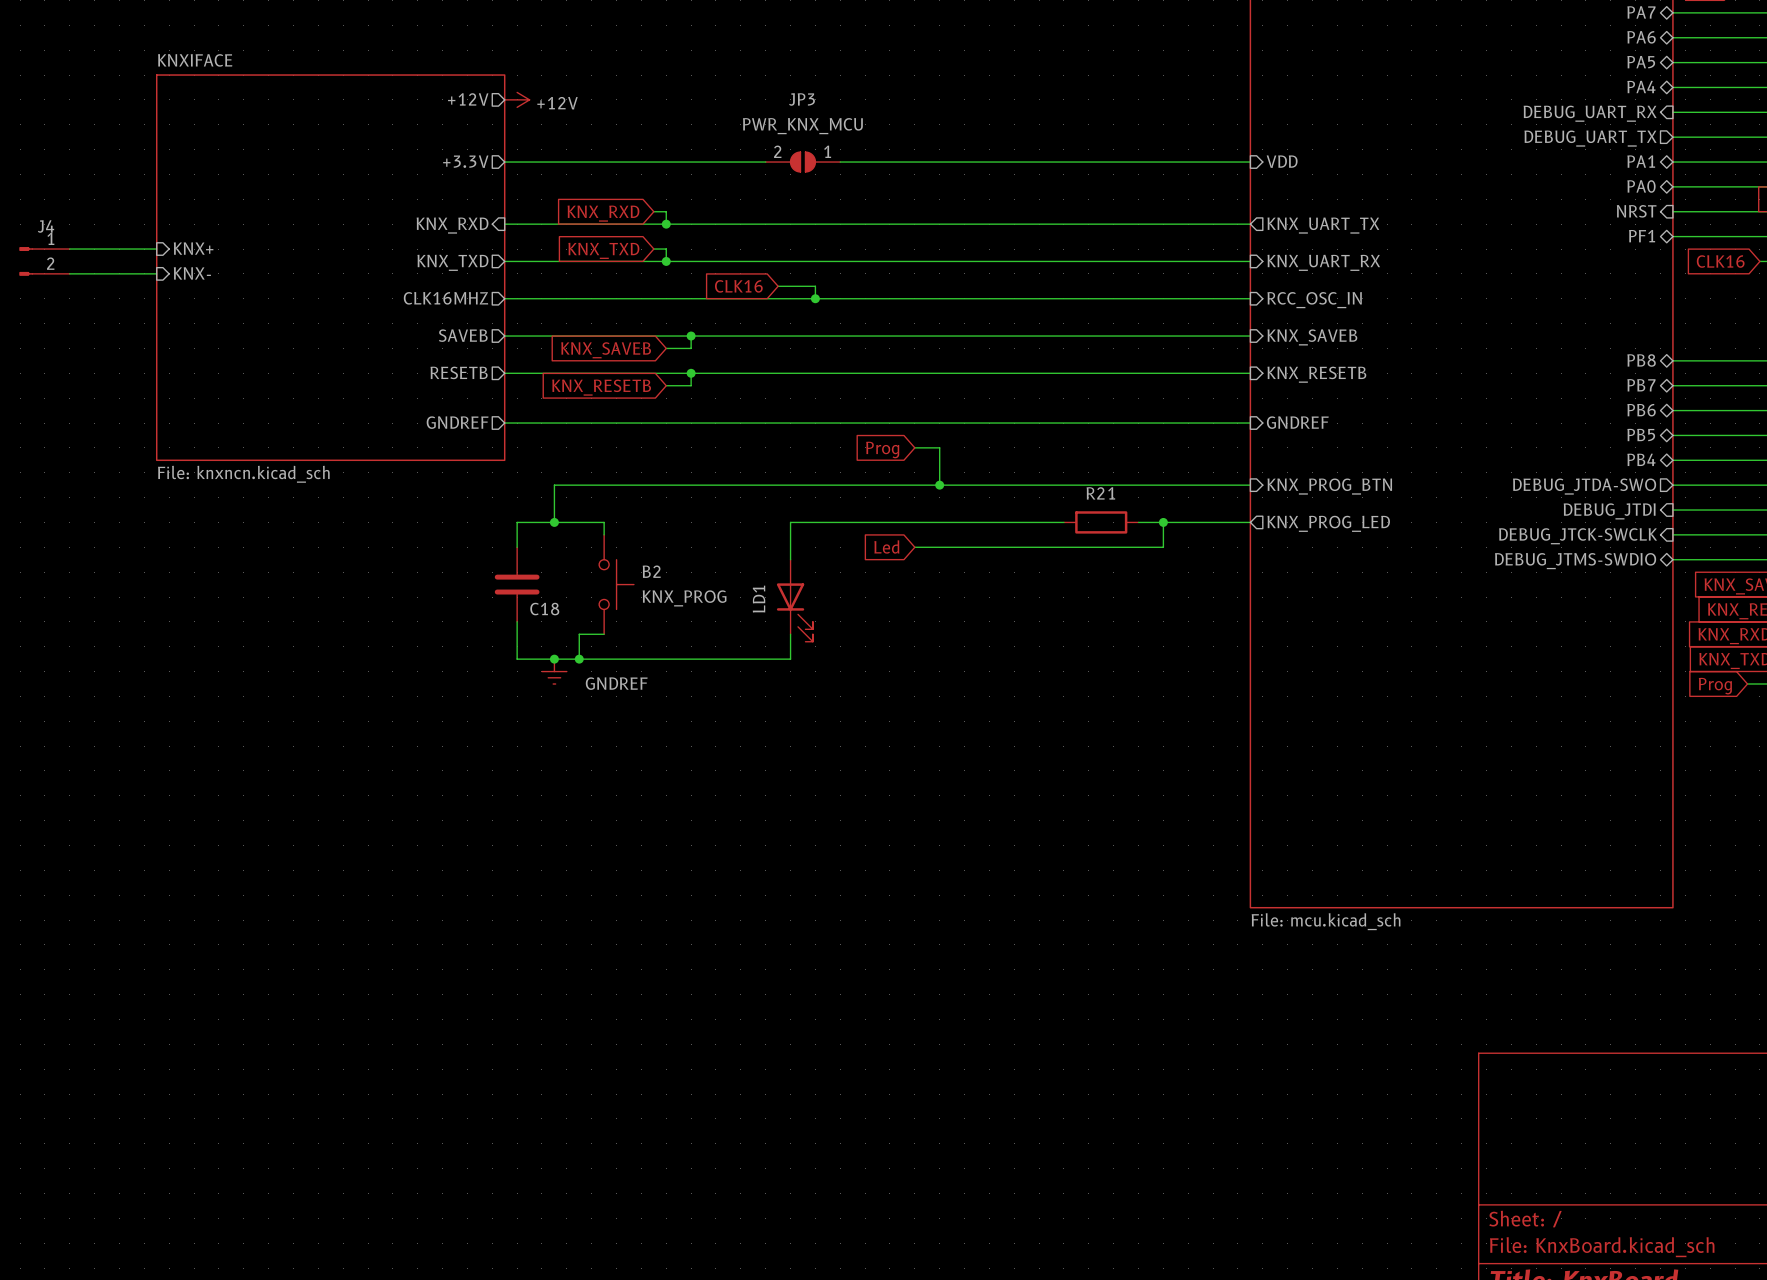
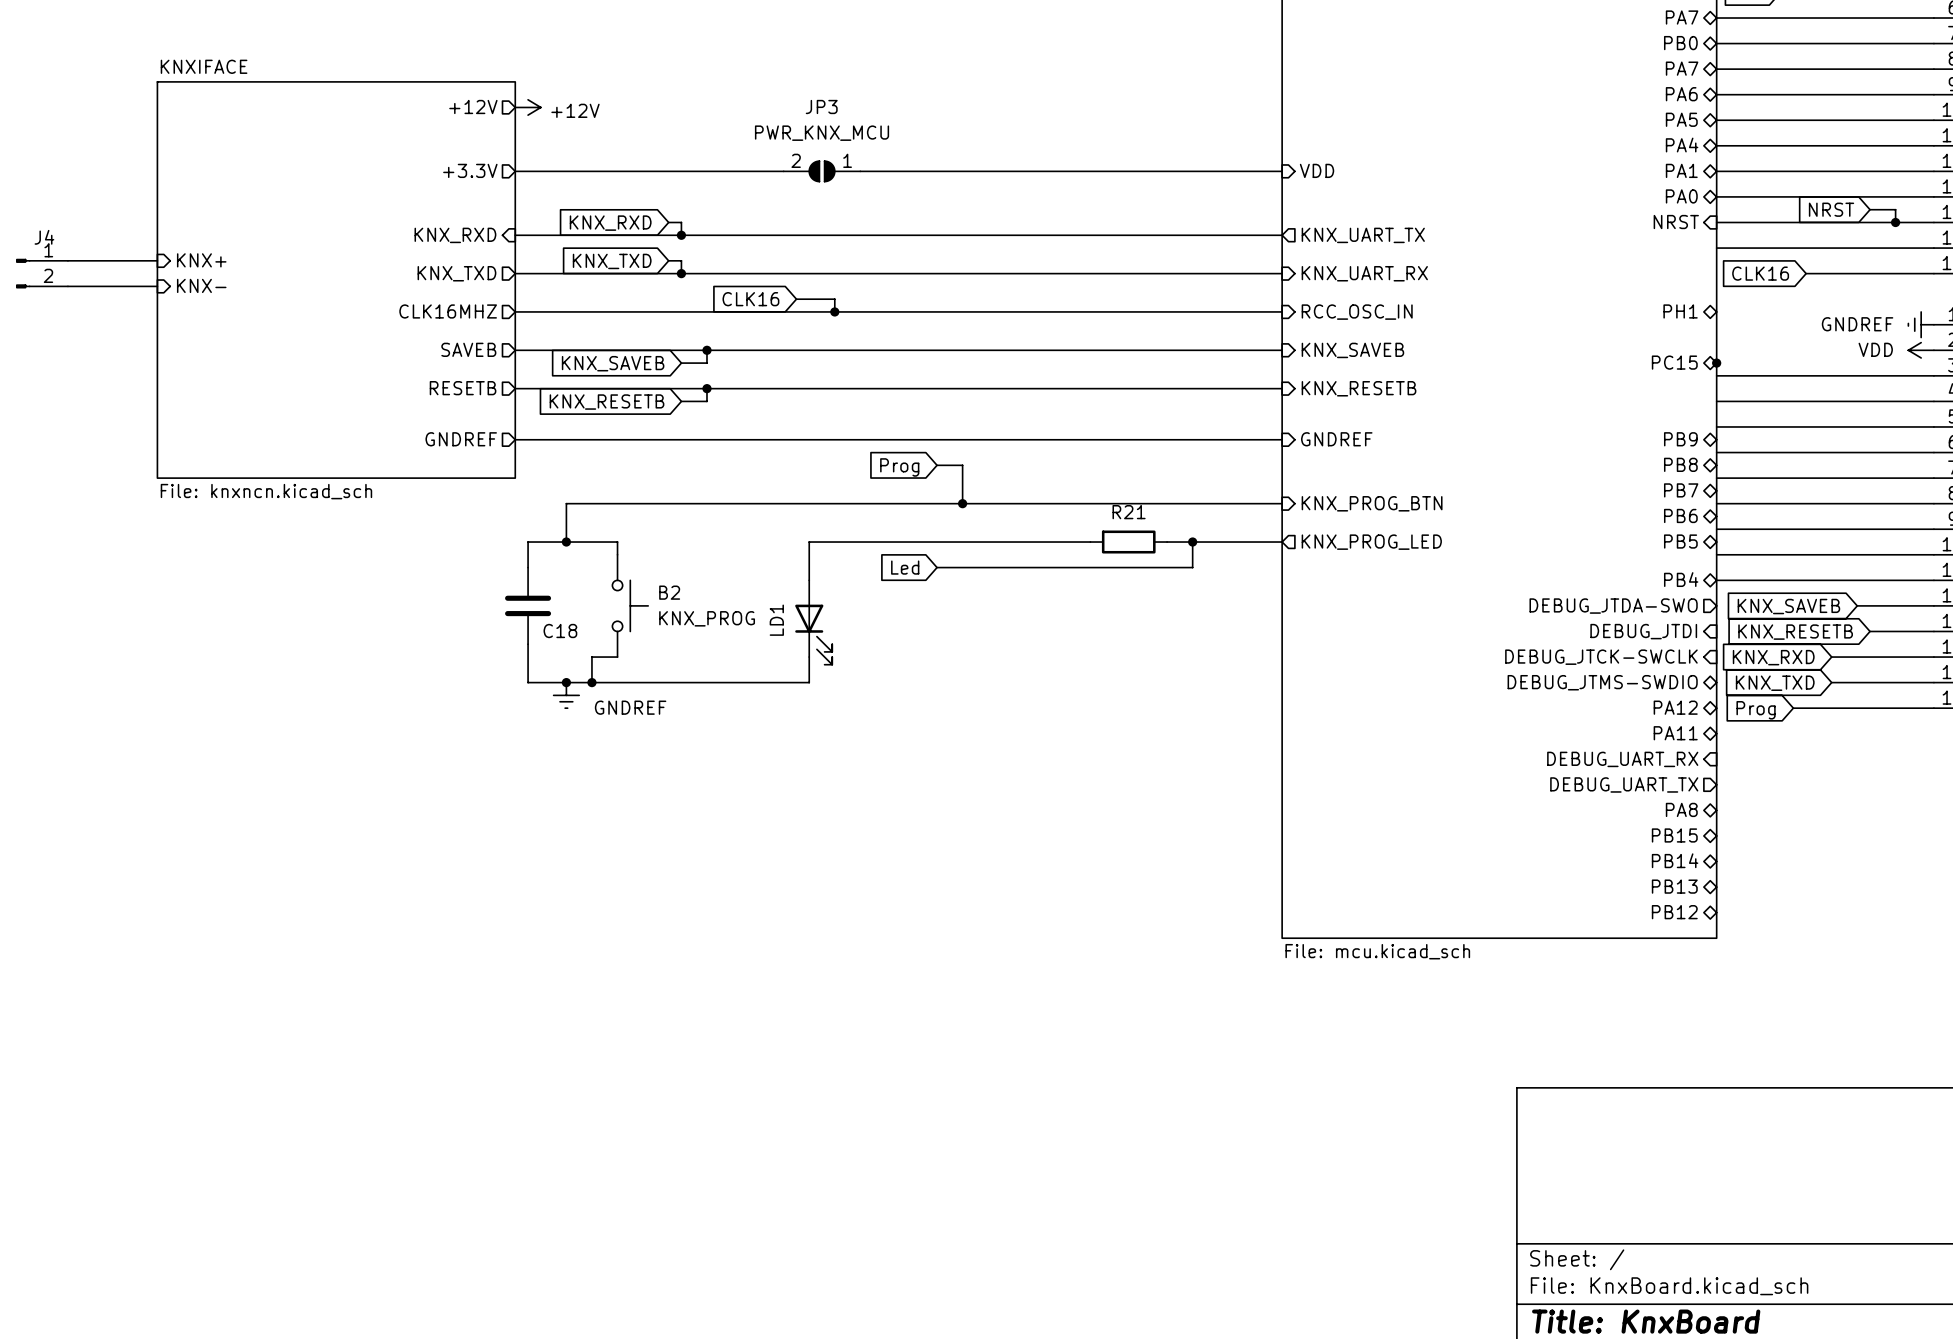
sheet pin: PA6 (1641, 37) -> PB0 (1680, 43)
sheet pin: PA5 (1641, 62) -> PA7 (1682, 68)
sheet pin: PA4 (1641, 86) -> PA6 (1681, 94)
sheet pin shape: input (1590, 113) -> bidirectional (1681, 119)
sheet pin: DEBUG_UART_RX (1590, 113) -> PA5 (1681, 119)
sheet pin shape: output (1590, 138) -> bidirectional (1682, 145)
sheet pin: DEBUG_UART_TX (1590, 138) -> PA4 (1682, 145)
sheet pin: PF1 (1642, 236) -> none
sheet pin: none -> PH1 (1680, 311)
sheet pin: none -> PC15 (1674, 362)
junction: none -> (1716, 363)
sheet pin position: PB8 (1641, 360) -> PB8 (1680, 464)
sheet pin position: PB7 (1641, 385) -> PB7 (1681, 490)
sheet pin position: PB6 (1641, 410) -> PB6 (1680, 515)
sheet pin: none -> PB9 (1680, 439)
sheet pin position: PB5 (1641, 435) -> PB5 (1680, 541)
sheet pin: PB4 (1641, 459) -> none
sheet pin position: DEBUG_JTDA-SWO (1584, 486) -> DEBUG_JTDA-SWO (1613, 606)
sheet pin position: DEBUG_JTDI (1609, 511) -> DEBUG_JTDI (1643, 631)
sheet pin position: DEBUG_JTCK-SWCLK (1578, 536) -> DEBUG_JTCK-SWCLK (1601, 657)
sheet pin: DEBUG_JTMS-SWDIO (1575, 561) -> PB4 (1681, 579)
sheet pin: none -> DEBUG_JTMS-SWDIO (1602, 682)
sheet pin: none -> PA12 (1675, 707)
sheet pin: none -> PA11 (1675, 733)
sheet pin: none -> DEBUG_UART_RX (1622, 759)
sheet pin: none -> DEBUG_UART_TX (1624, 784)
sheet pin: none -> PA8 (1681, 809)
sheet pin: none -> PB15 (1674, 835)
sheet pin: none -> PB14 (1675, 860)
sheet pin: none -> PB13 (1674, 886)
sheet pin: none -> PB12 (1674, 912)

